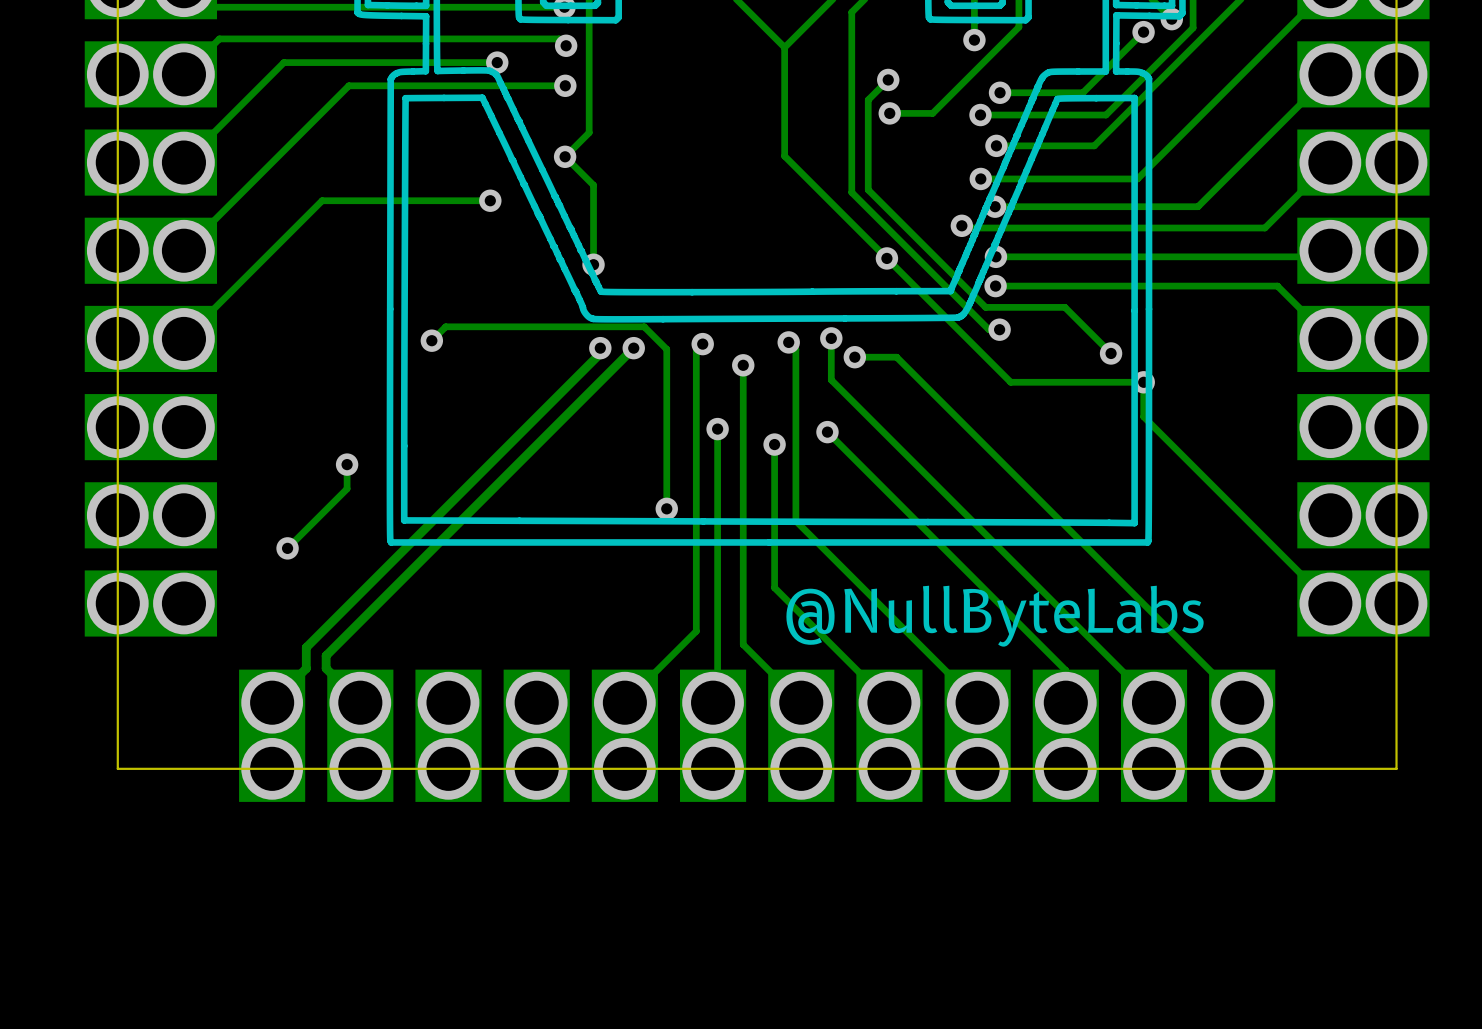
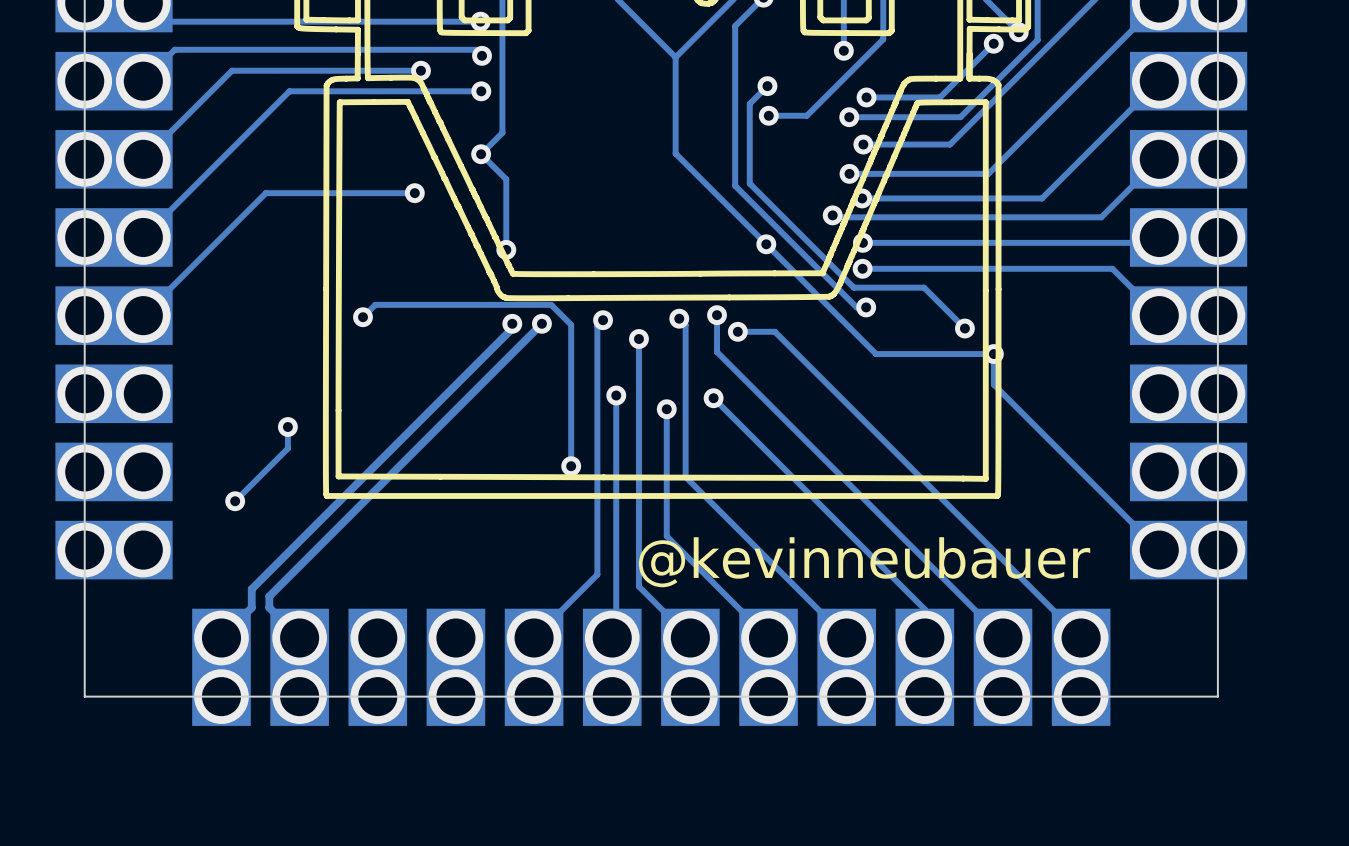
text: @NullByteLabs (995, 616) -> @kevinneubauer (864, 562)

